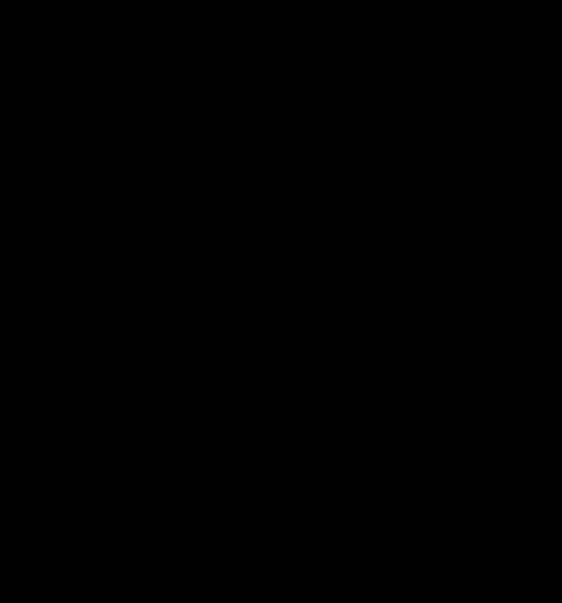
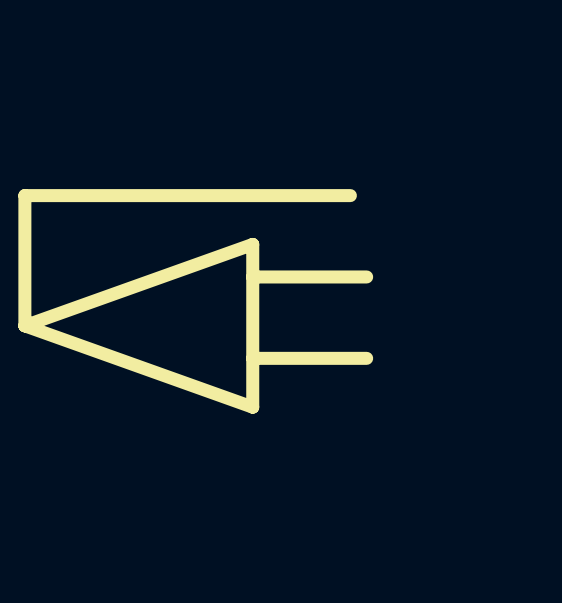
line: none -> (350, 195) (24, 195) (24, 325)
line: none -> (252, 276) (366, 276)
line: none -> (24, 325) (252, 244) (252, 407) (24, 325)
line: none -> (252, 358) (366, 358)

